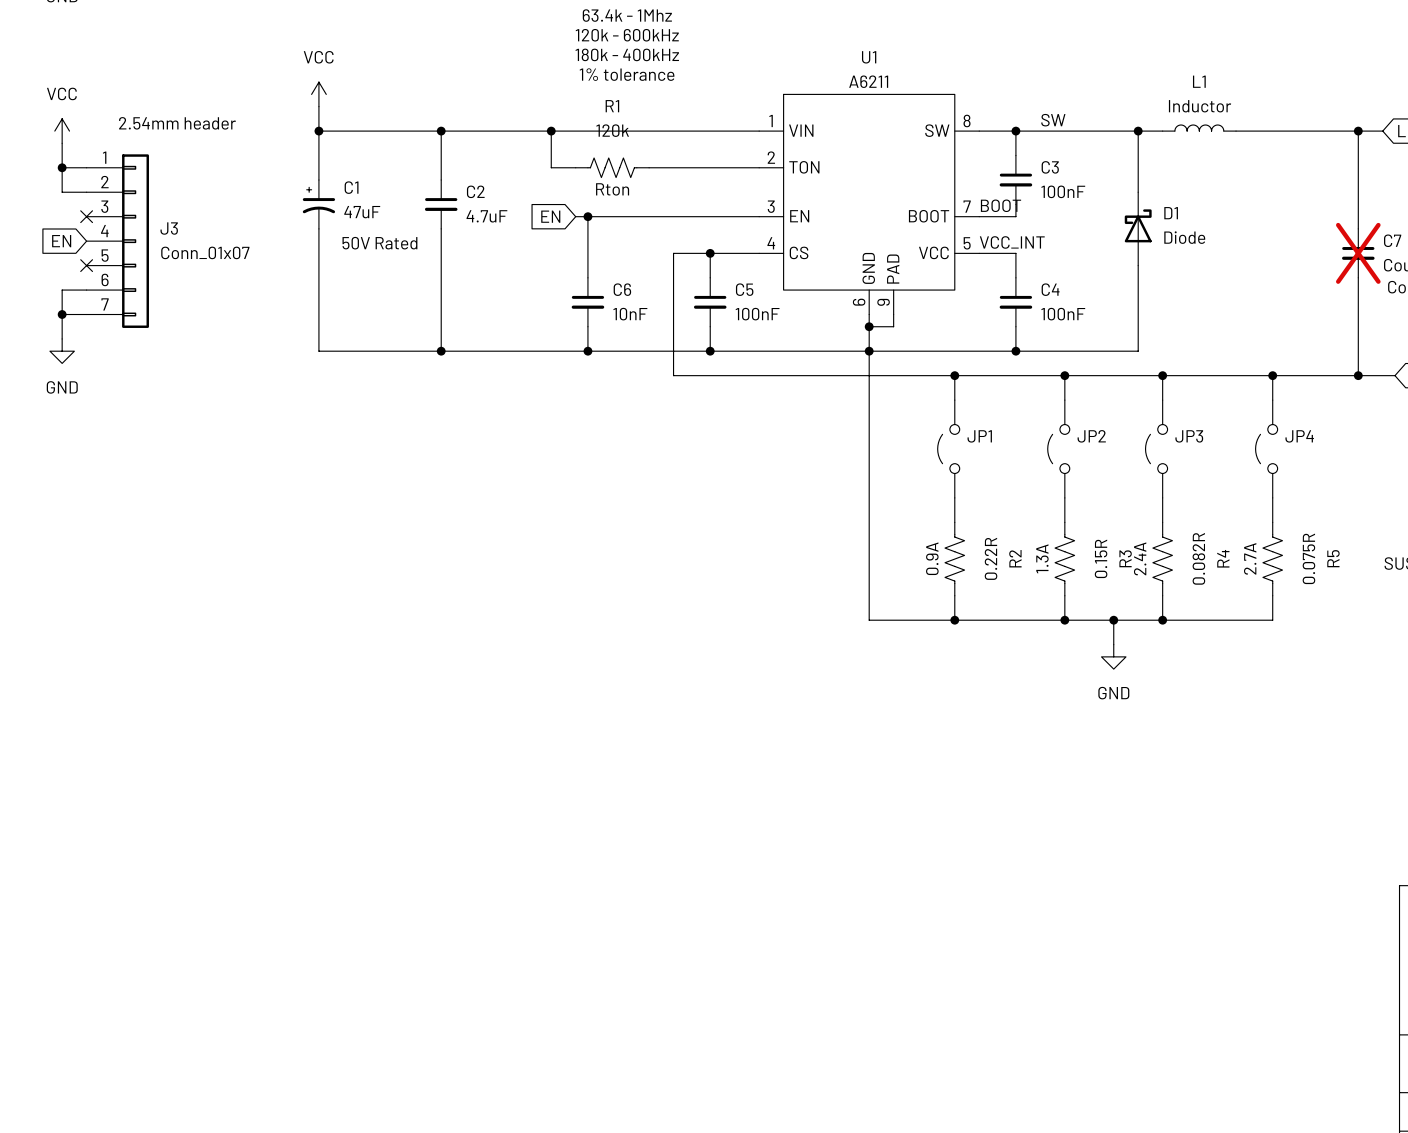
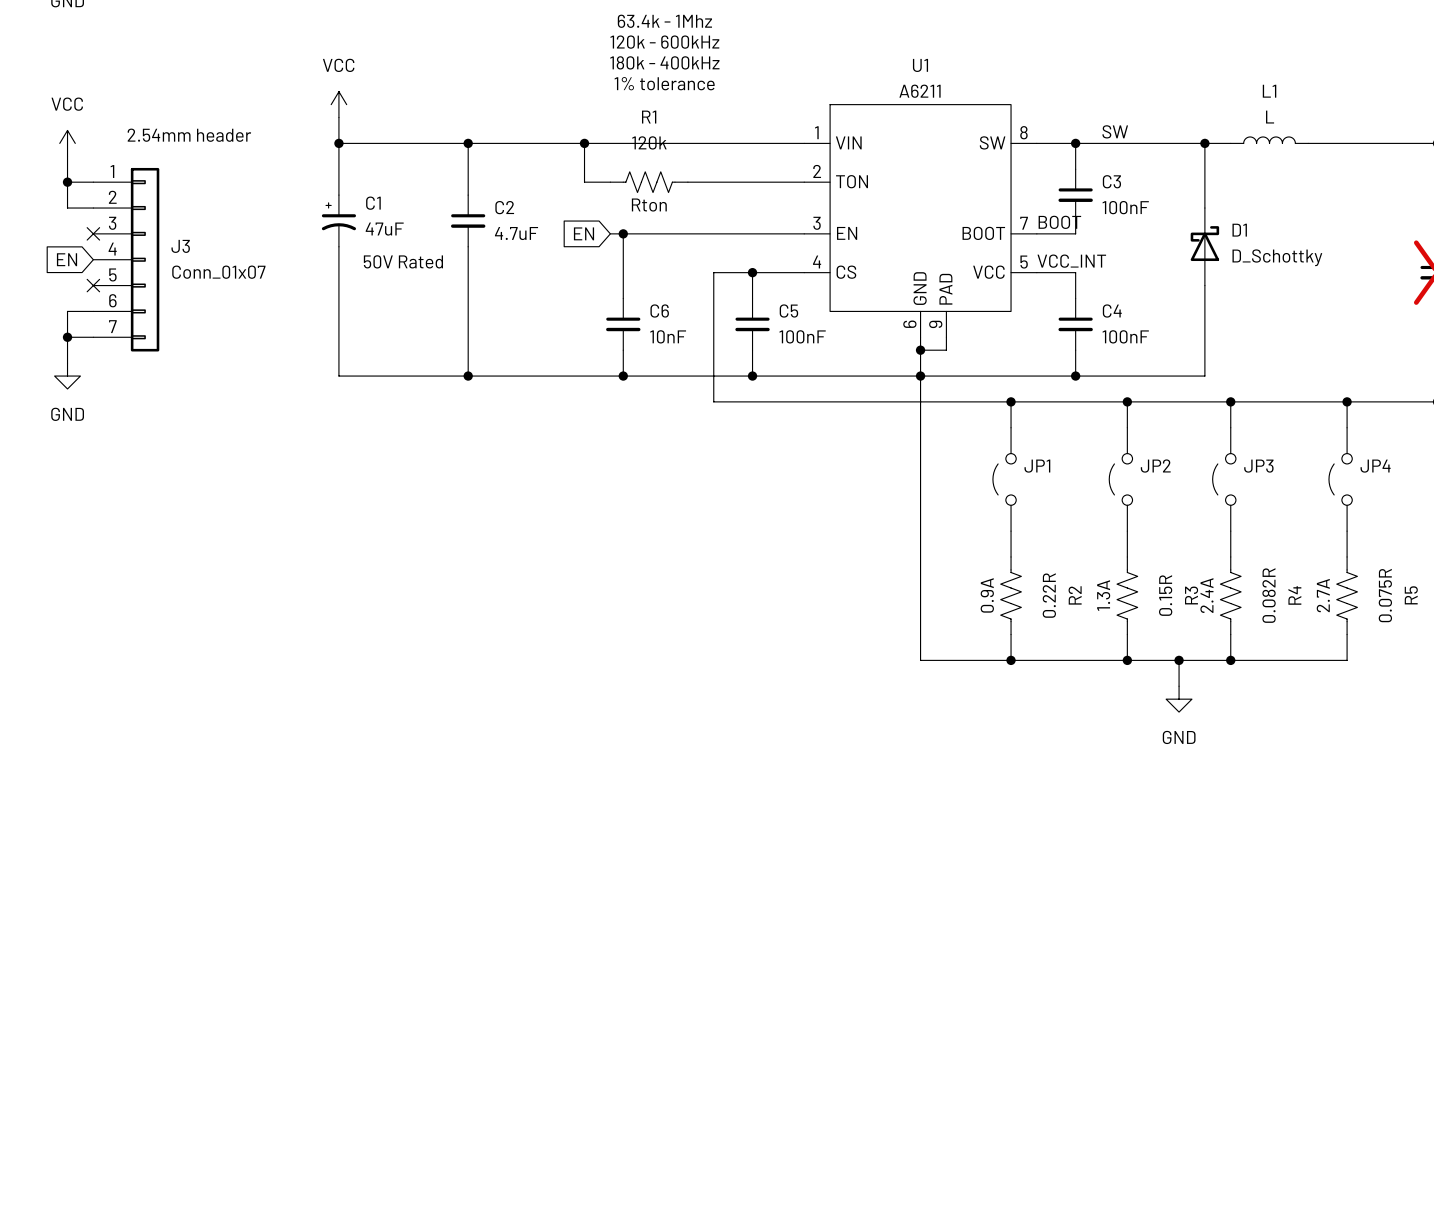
L1 value: Inductor (1200, 106) -> L (1270, 117)
D1 value: Diode (1184, 237) -> D_Schottky (1277, 257)

